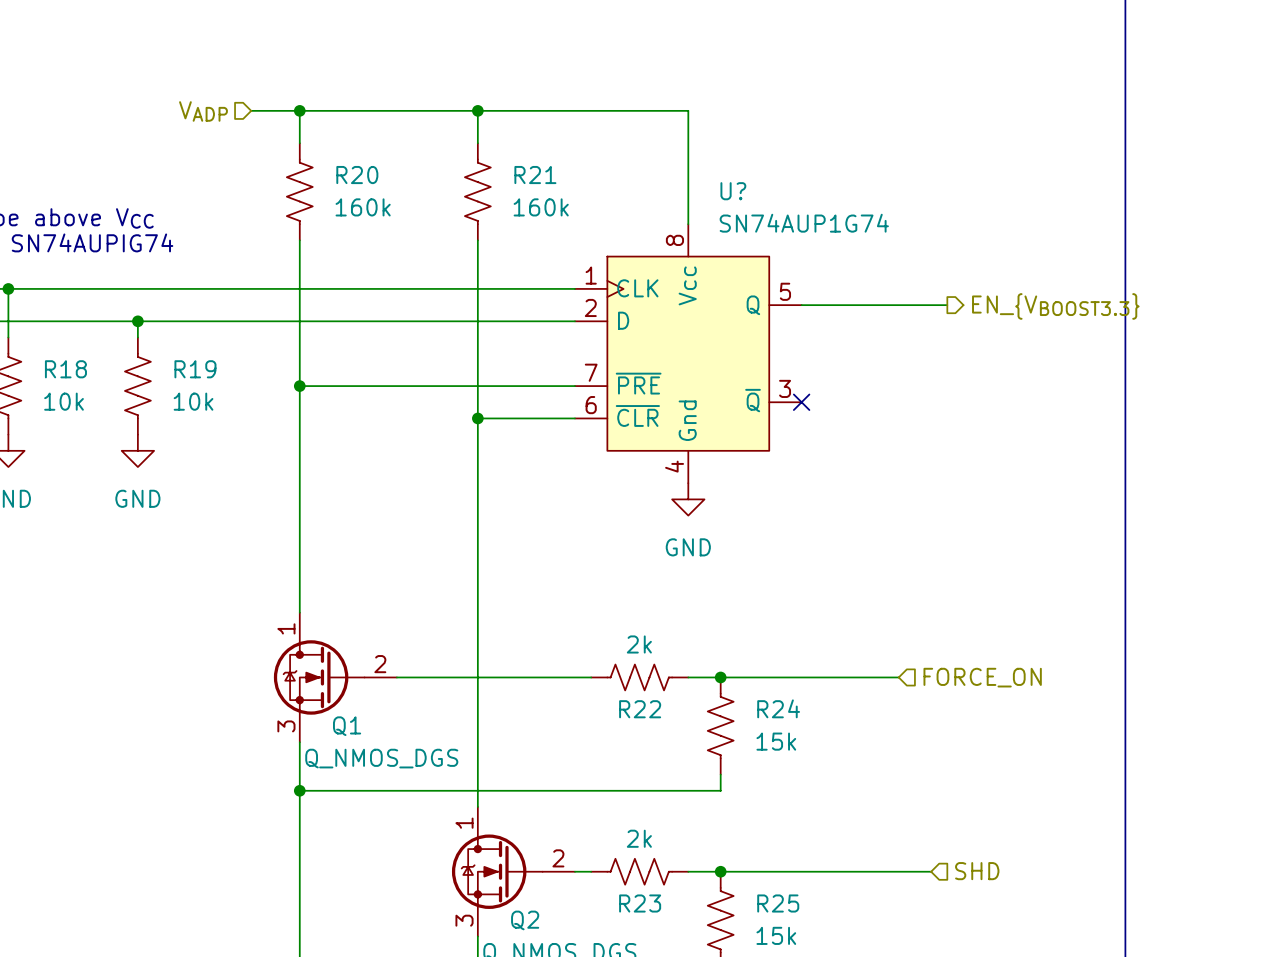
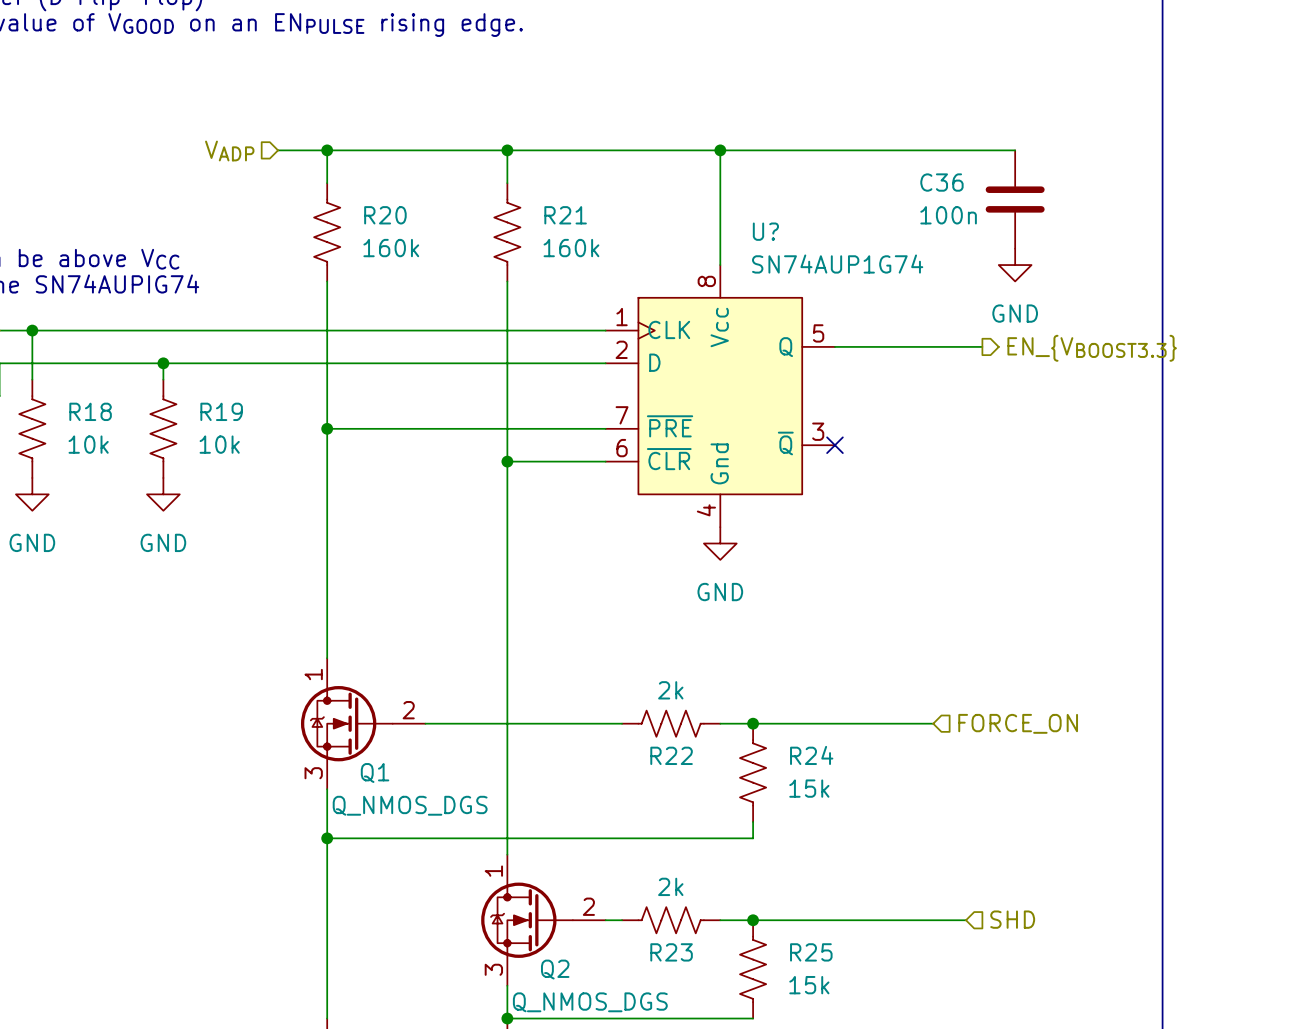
wire: none -> (720, 150) (1015, 150)
junction: none -> (720, 150)
C36: none -> 100n (1015, 199)
power symbol: none -> GND (1015, 265)

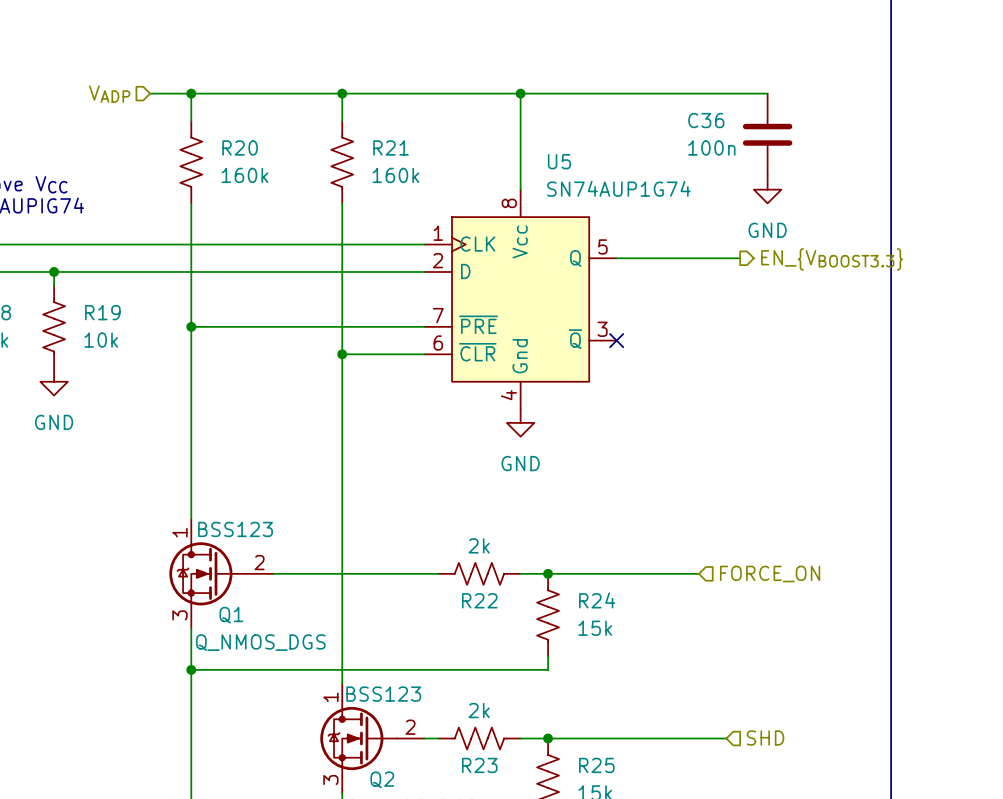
U? name: U? (765, 231) -> U5 (559, 161)
Q1 text: none -> BSS123 (235, 529)
Q2 text: none -> BSS123 (383, 694)

